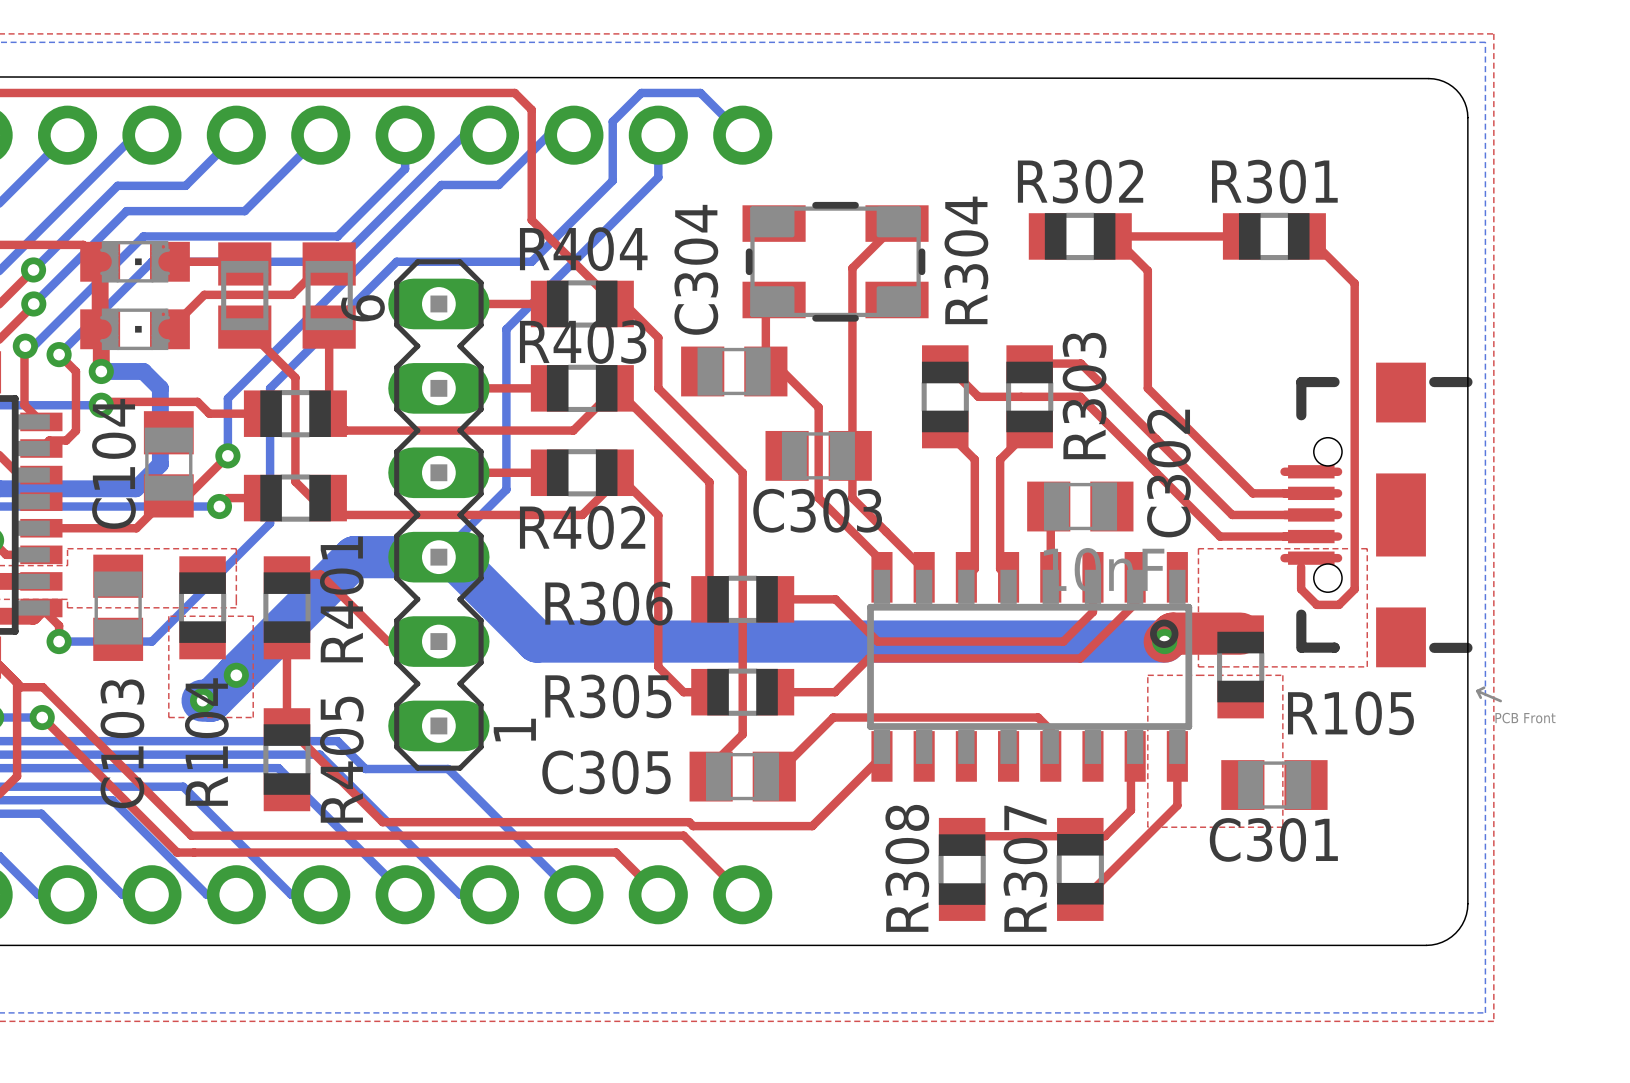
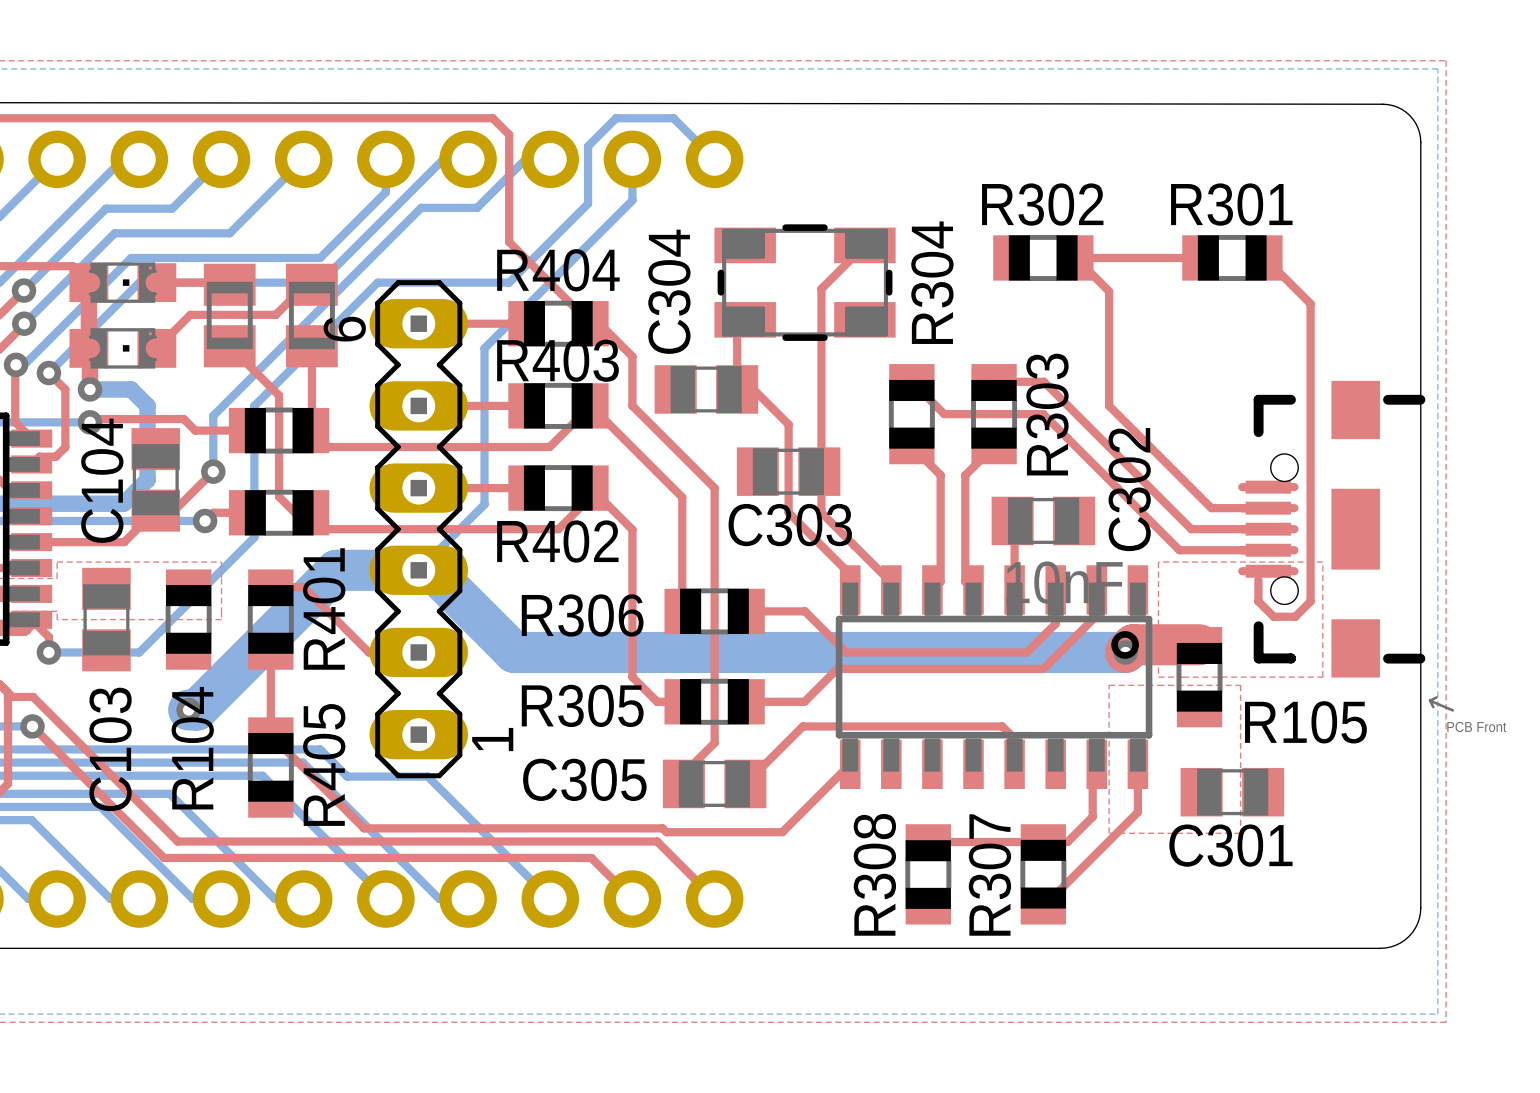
top zone outline: (168, 616) (168, 717) (253, 717) (253, 616) (168, 616) -> none
via: (236, 675) -> none

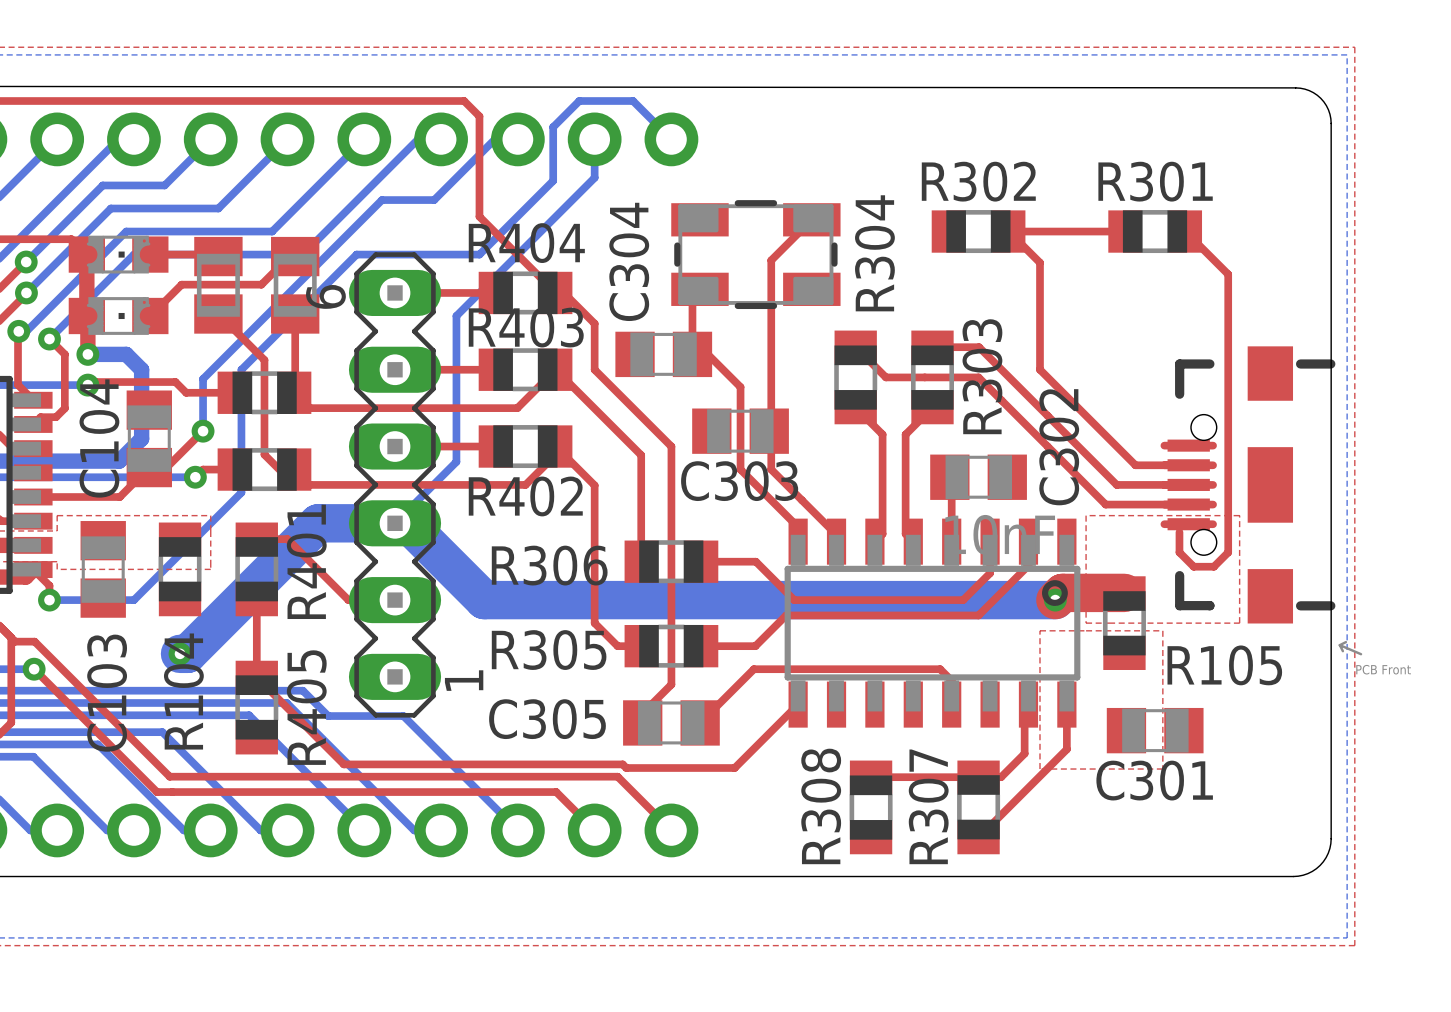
bottom track: (385, 159) (385, 192) (320, 257) (287, 257) -> (364, 139) (272, 231)
bottom track: (477, 207) (421, 207) (404, 224) -> (449, 184) (434, 200) (381, 200)

